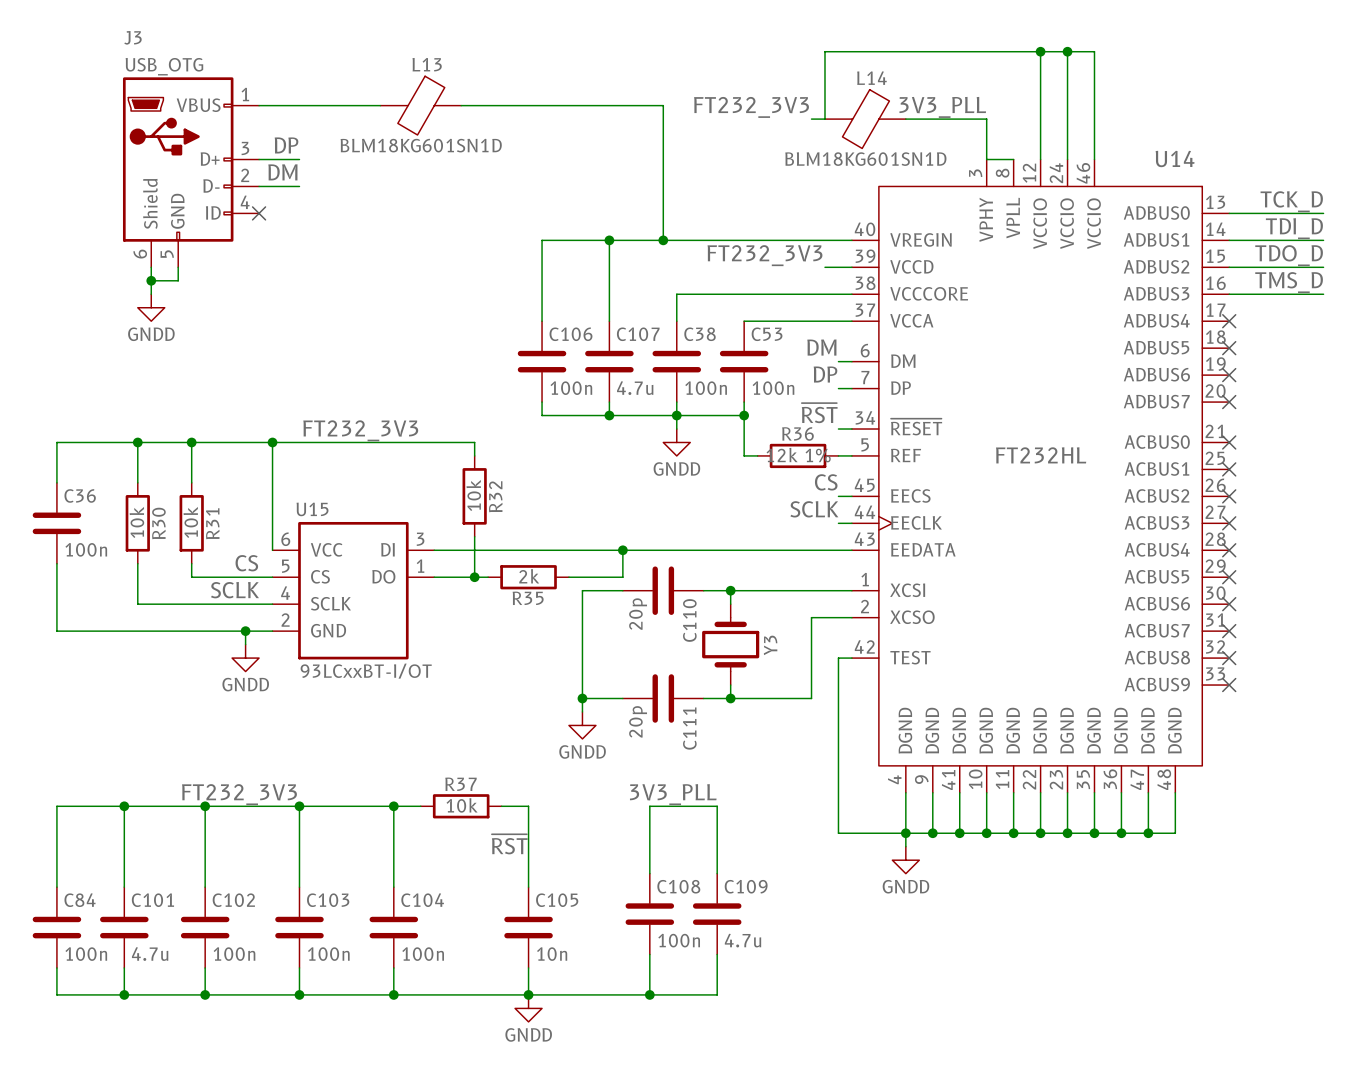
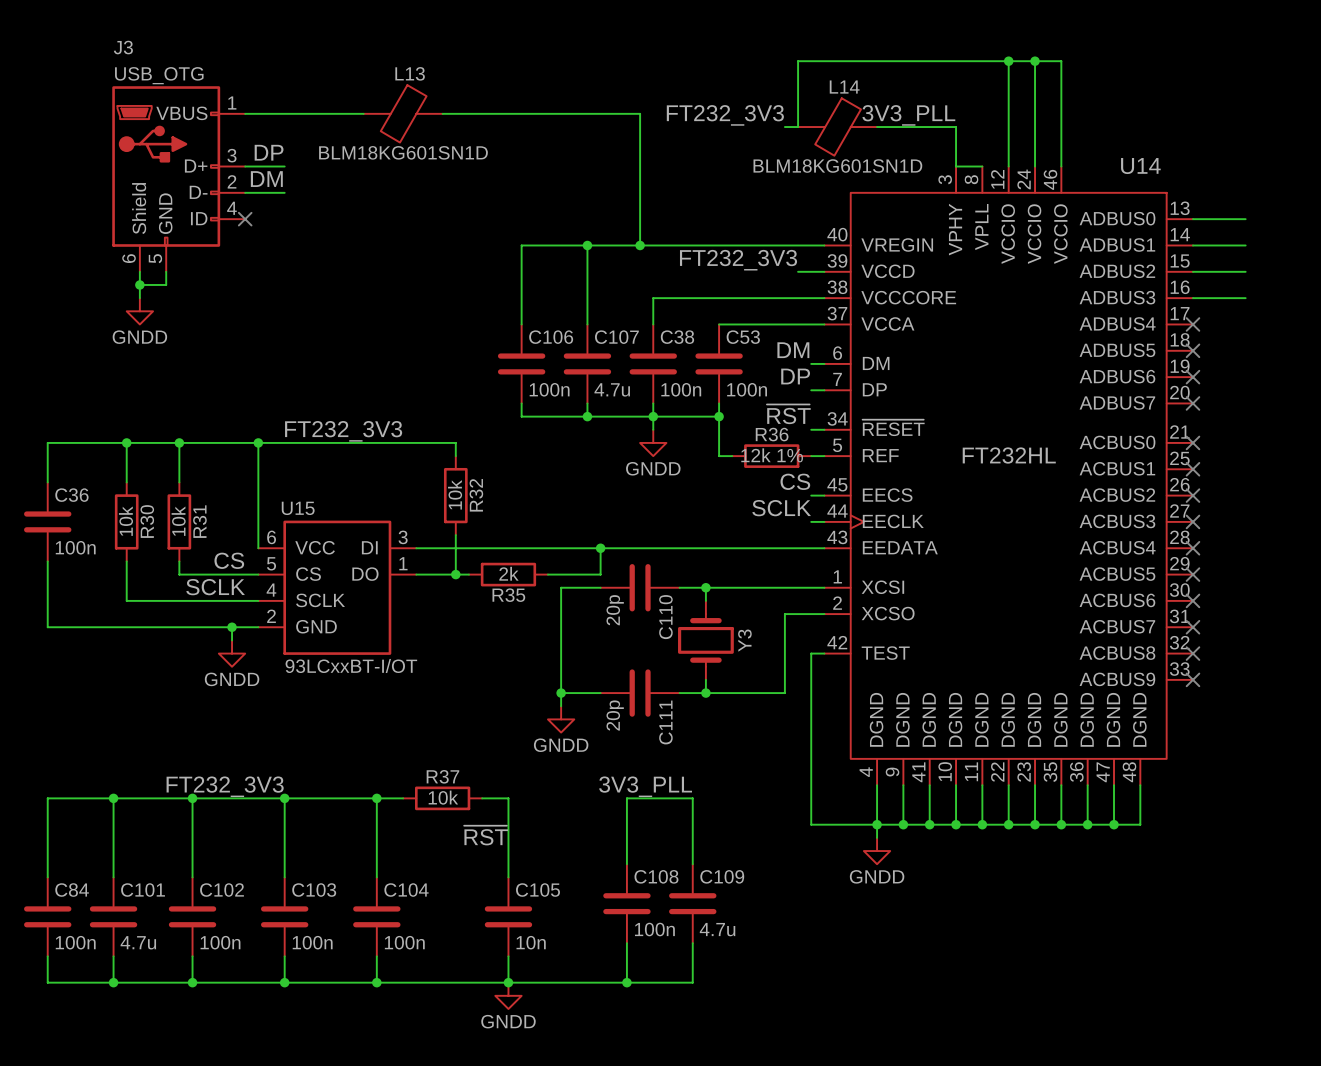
label: TCK_D (1291, 201) -> none
wire: (1283, 213) (1323, 213) -> none
label: TDI_D (1294, 228) -> none
wire: (1283, 240) (1323, 240) -> none
label: TDO_D (1289, 255) -> none
wire: (1283, 267) (1323, 267) -> none
label: TMS_D (1289, 282) -> none
wire: (1283, 294) (1323, 294) -> none

